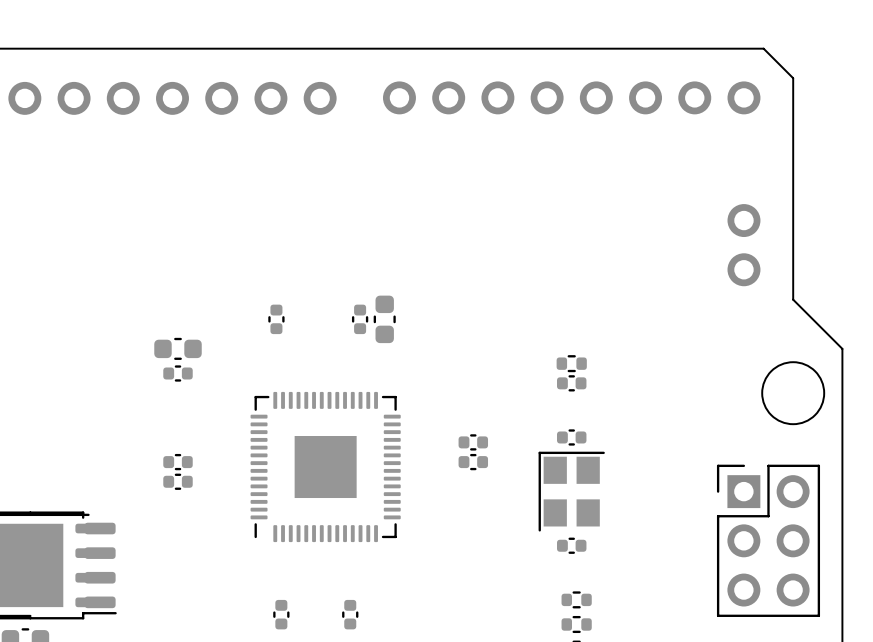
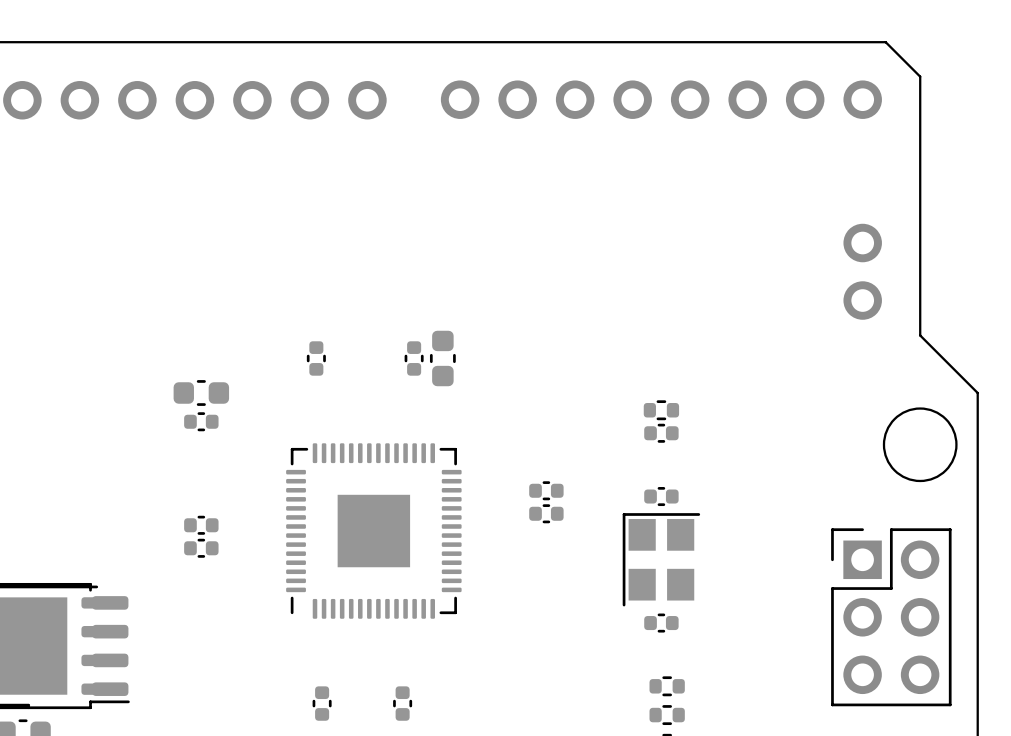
part: none -> (546, 490)
part: (473, 442) -> none
part: none -> (546, 513)
part: (473, 462) -> none

